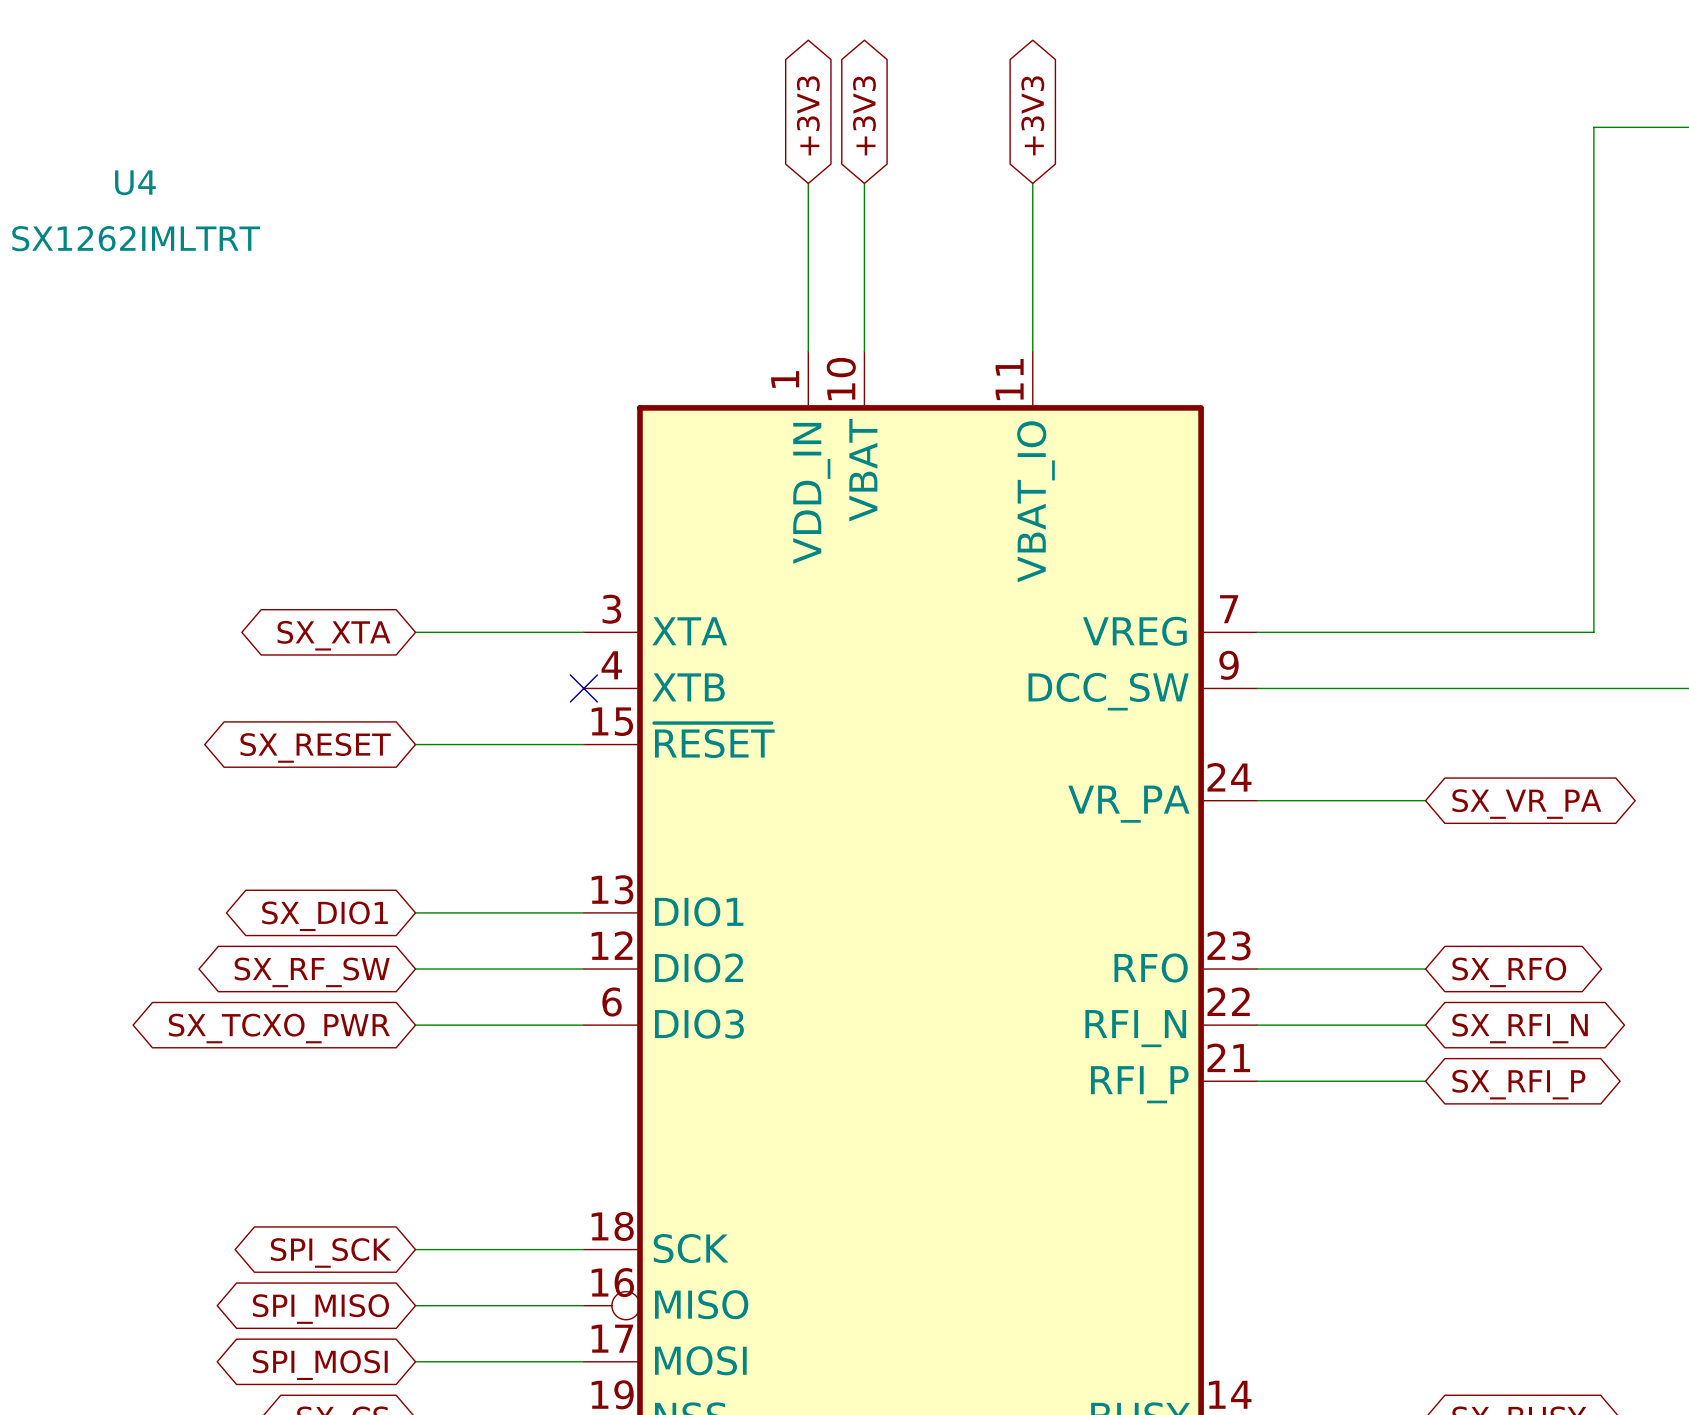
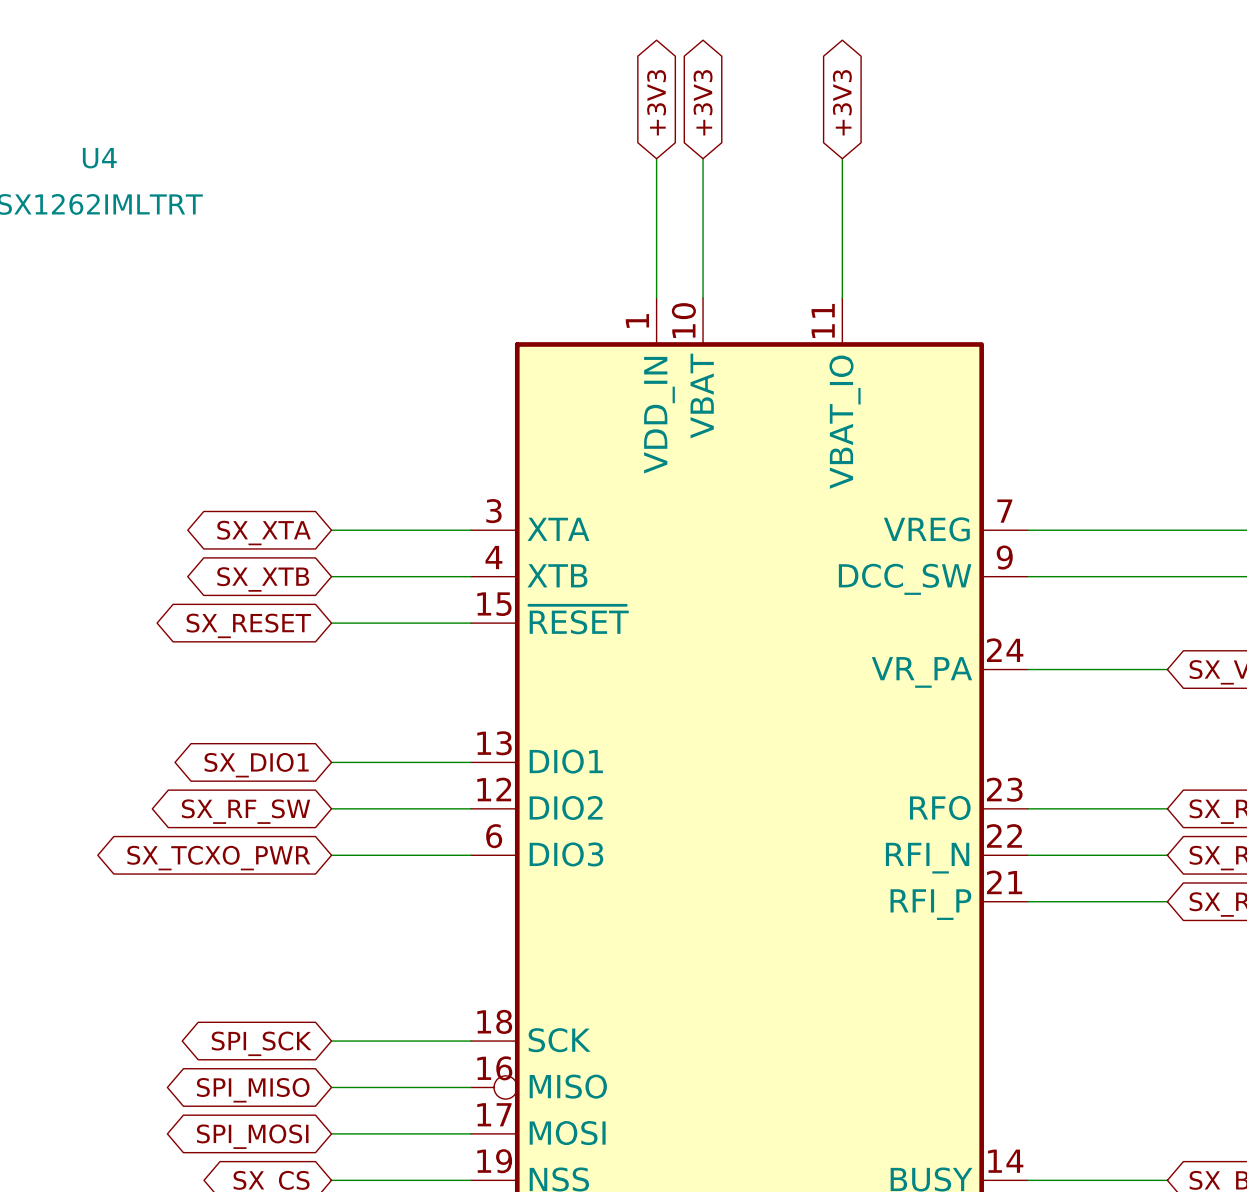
wire: none -> (331, 576) (470, 576)
no-connect mark: (583, 688) -> none
global label: none -> SX_XTB (263, 579)

